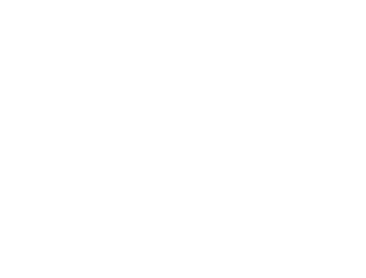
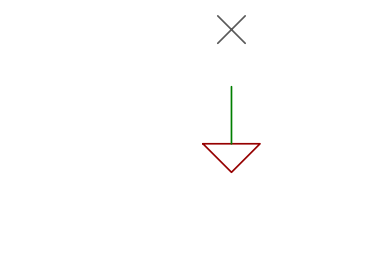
no-connect mark: none -> (231, 29)
wire: none -> (231, 86) (231, 143)
power symbol: none -> (231, 158)

